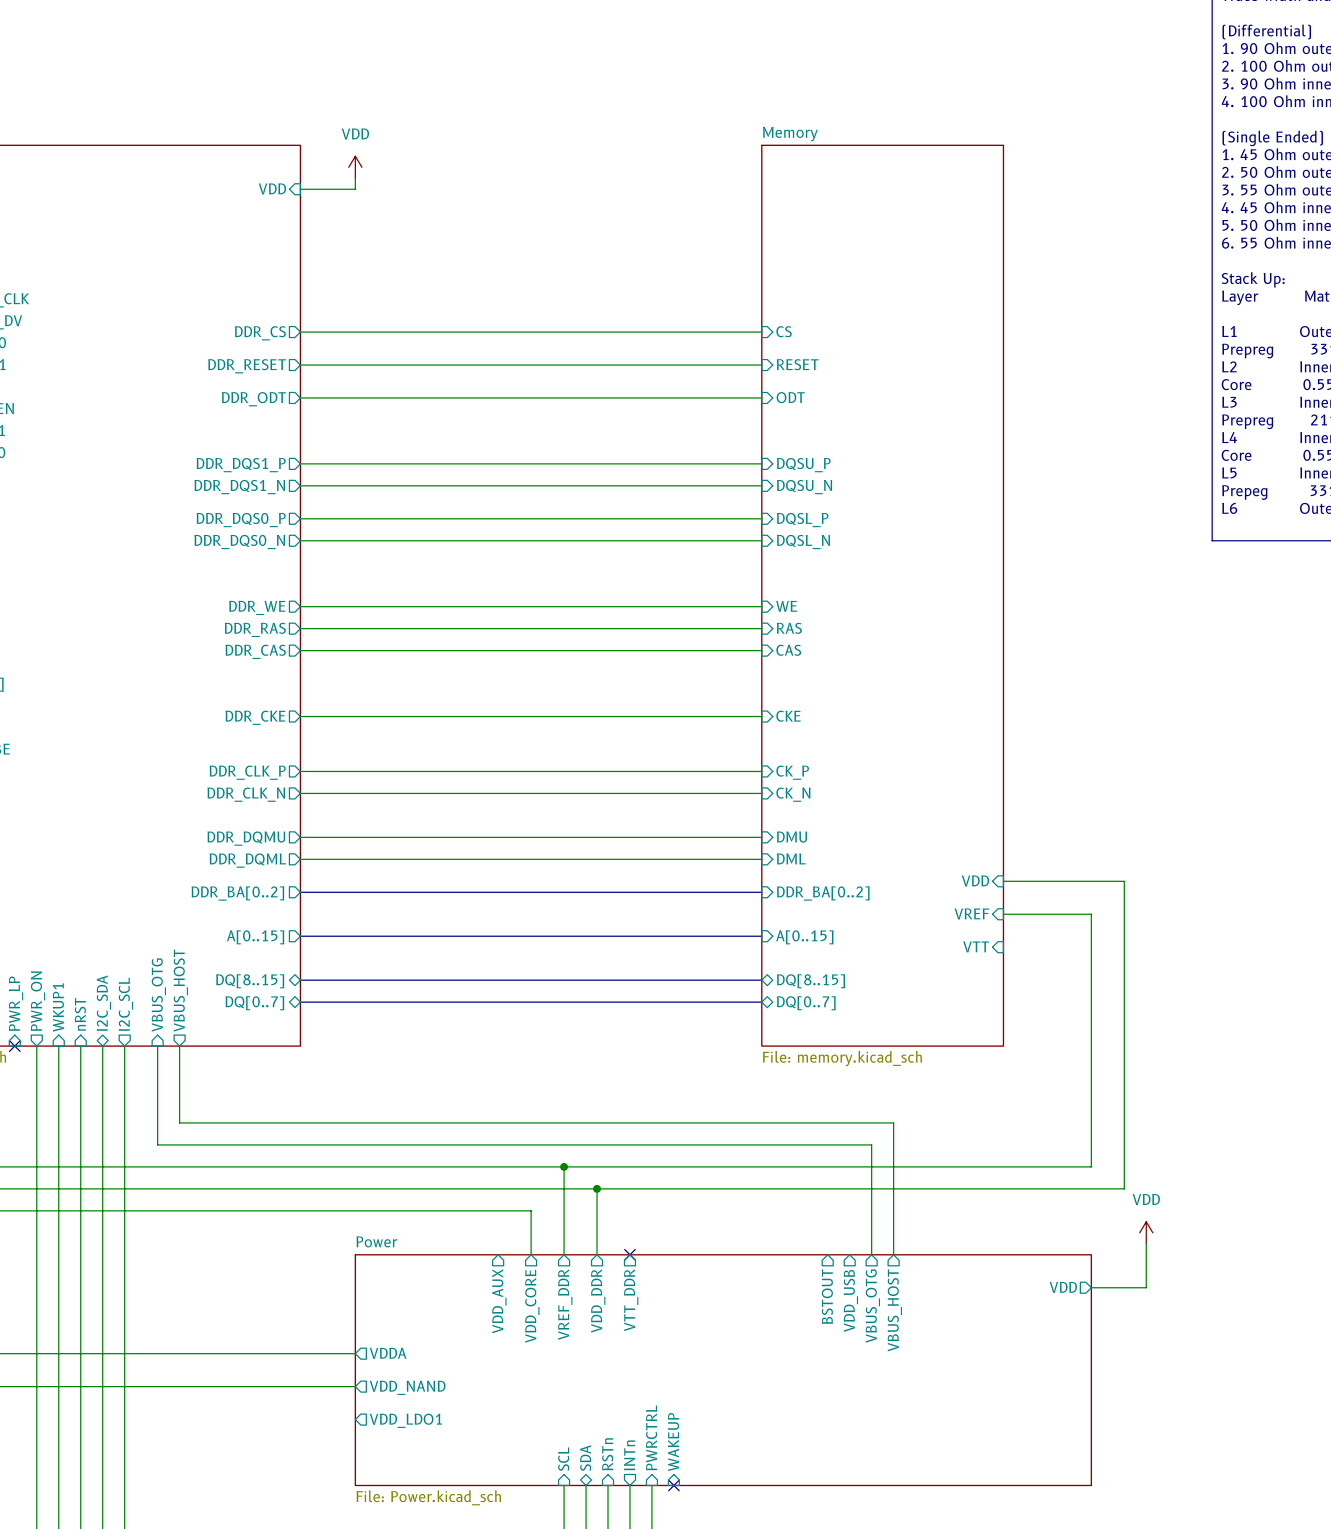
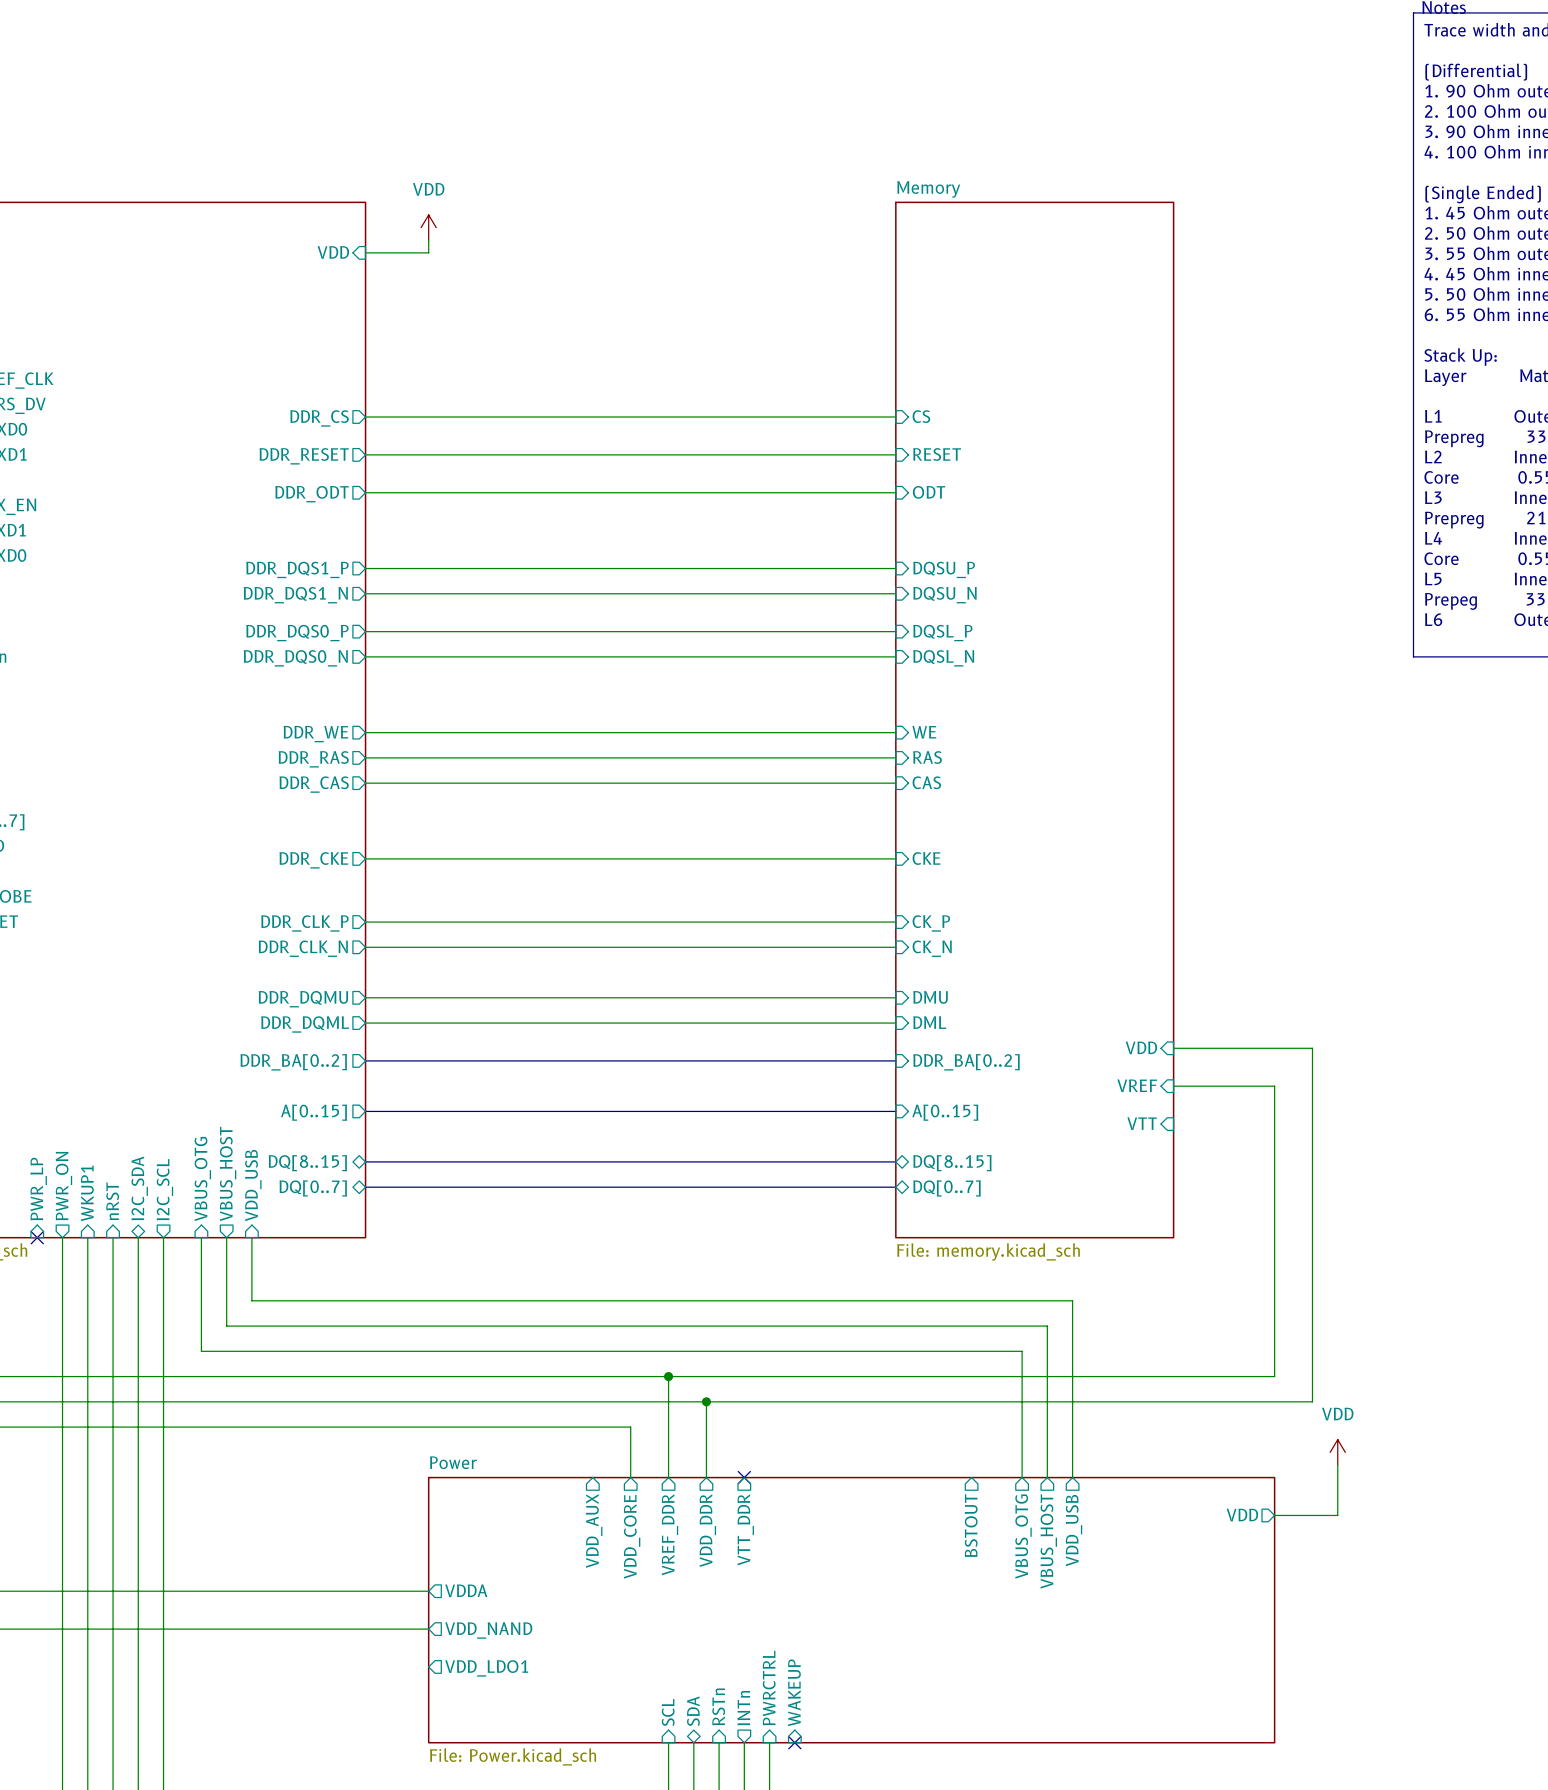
sheet pin: none -> VDD_USB (253, 1185)
wire: none -> (251, 1237) (251, 1300) (1072, 1300) (1072, 1477)
sheet pin position: VDD_USB (850, 1300) -> VDD_USB (1074, 1530)

